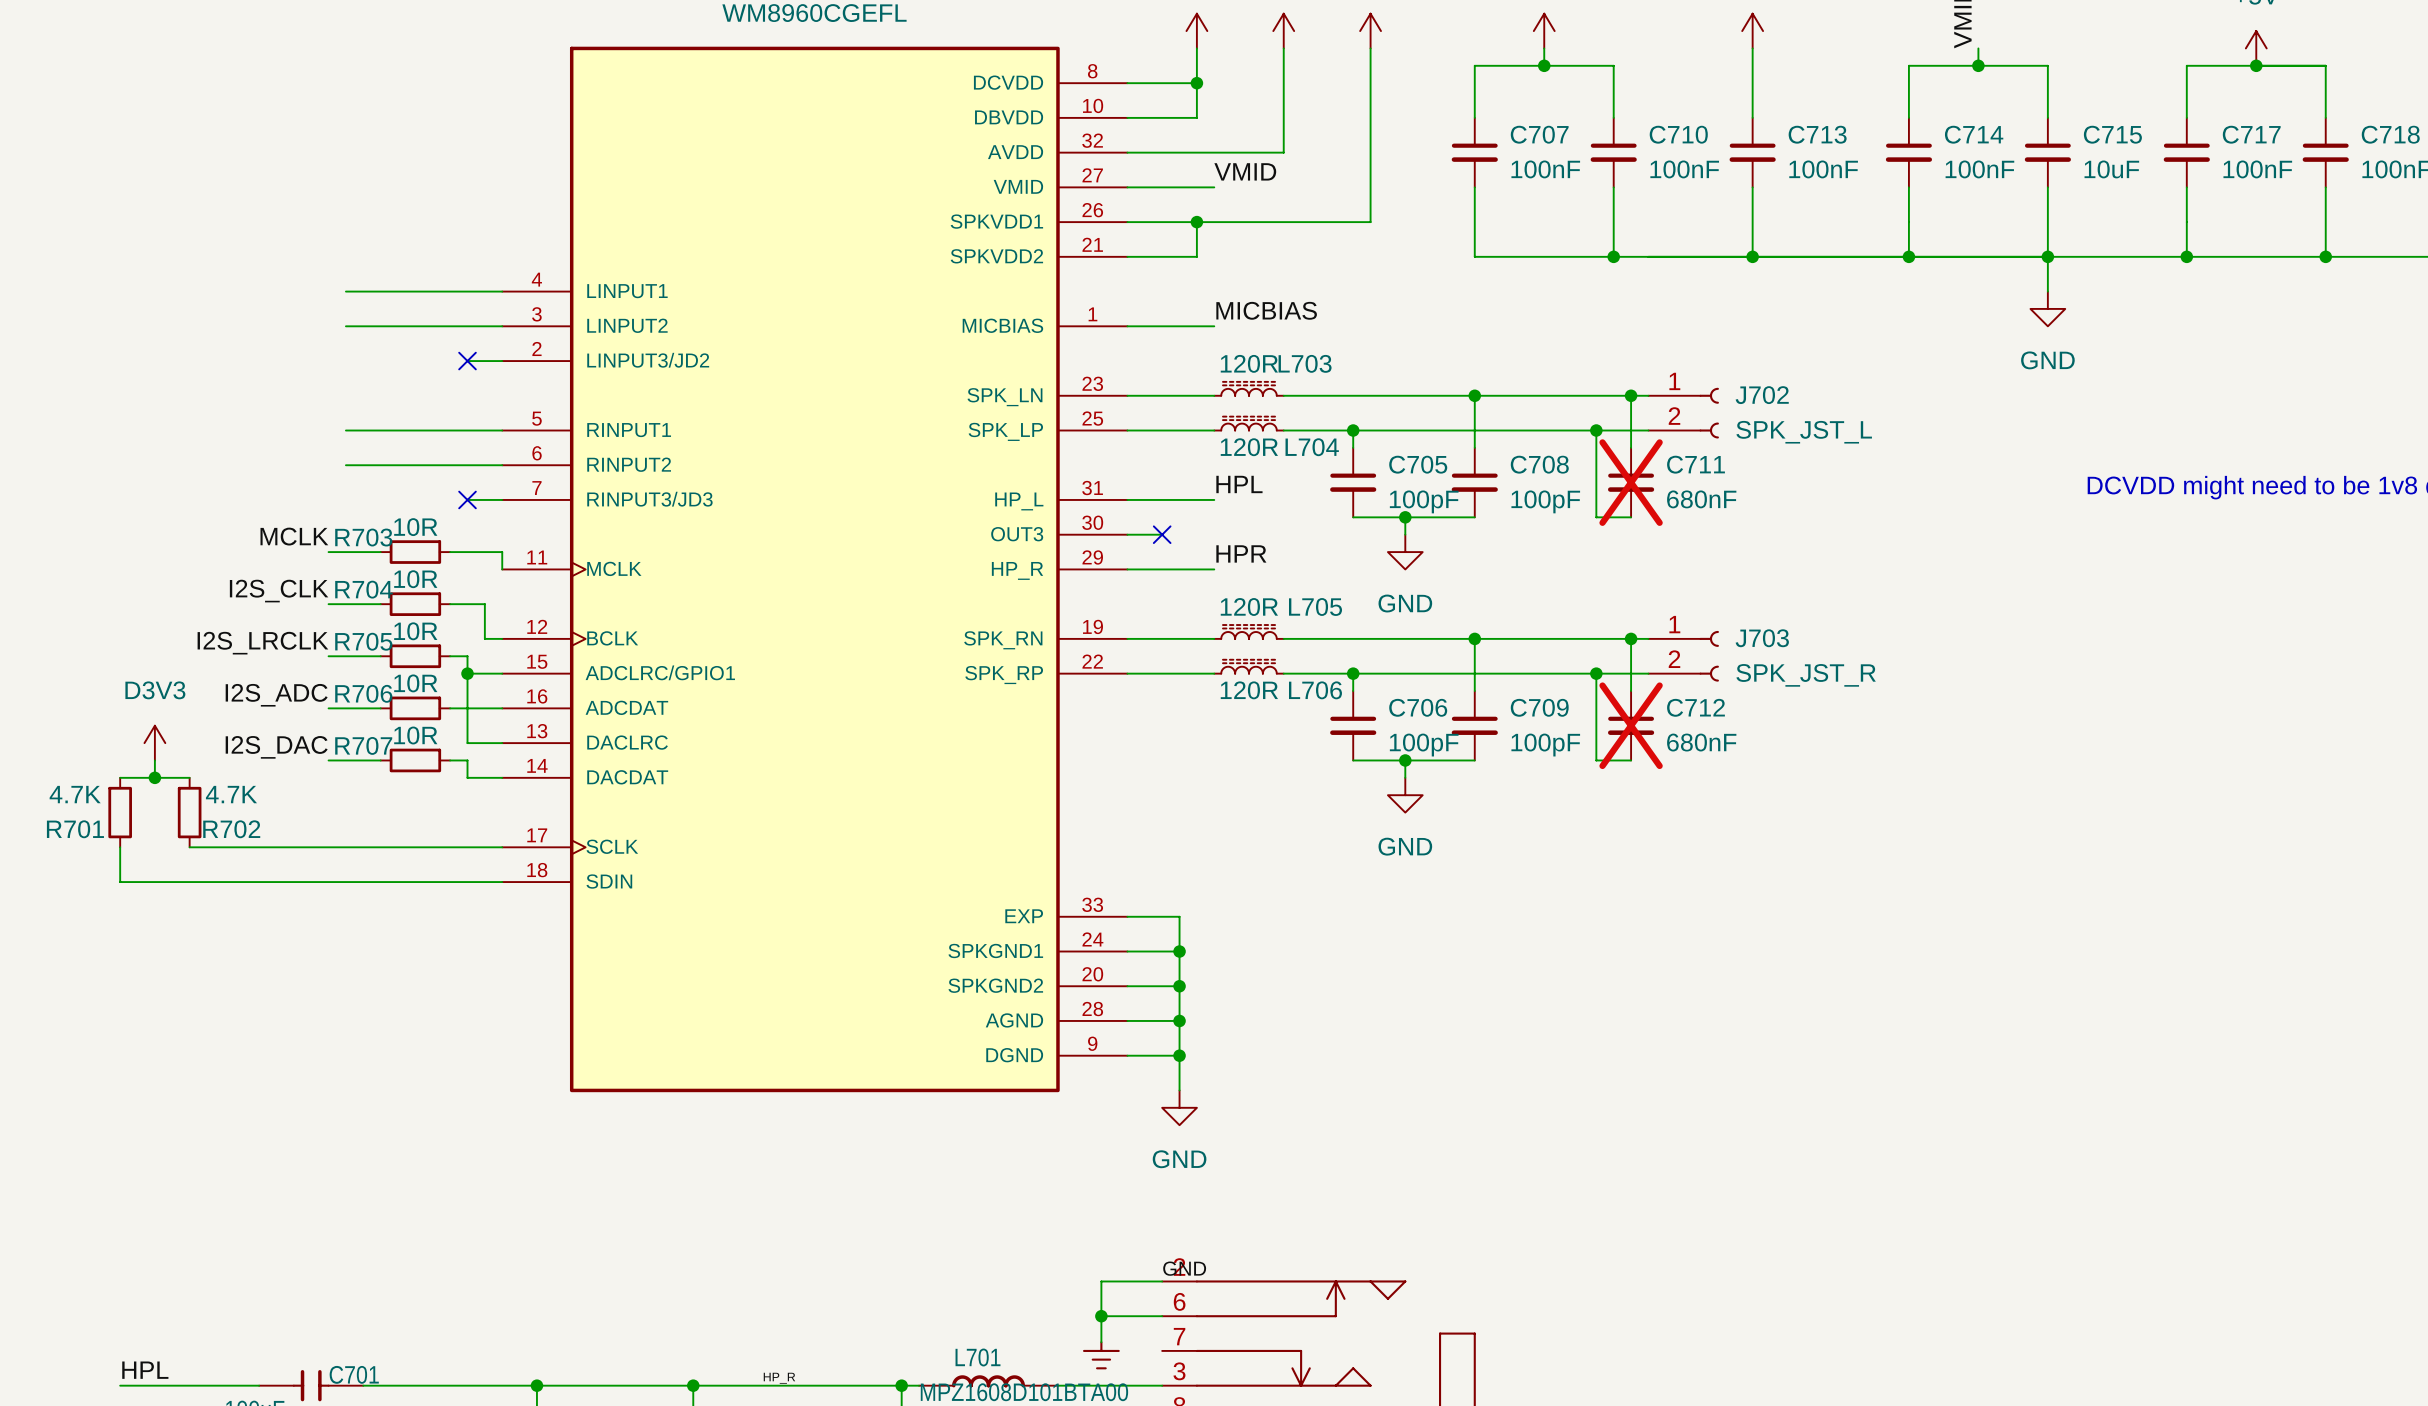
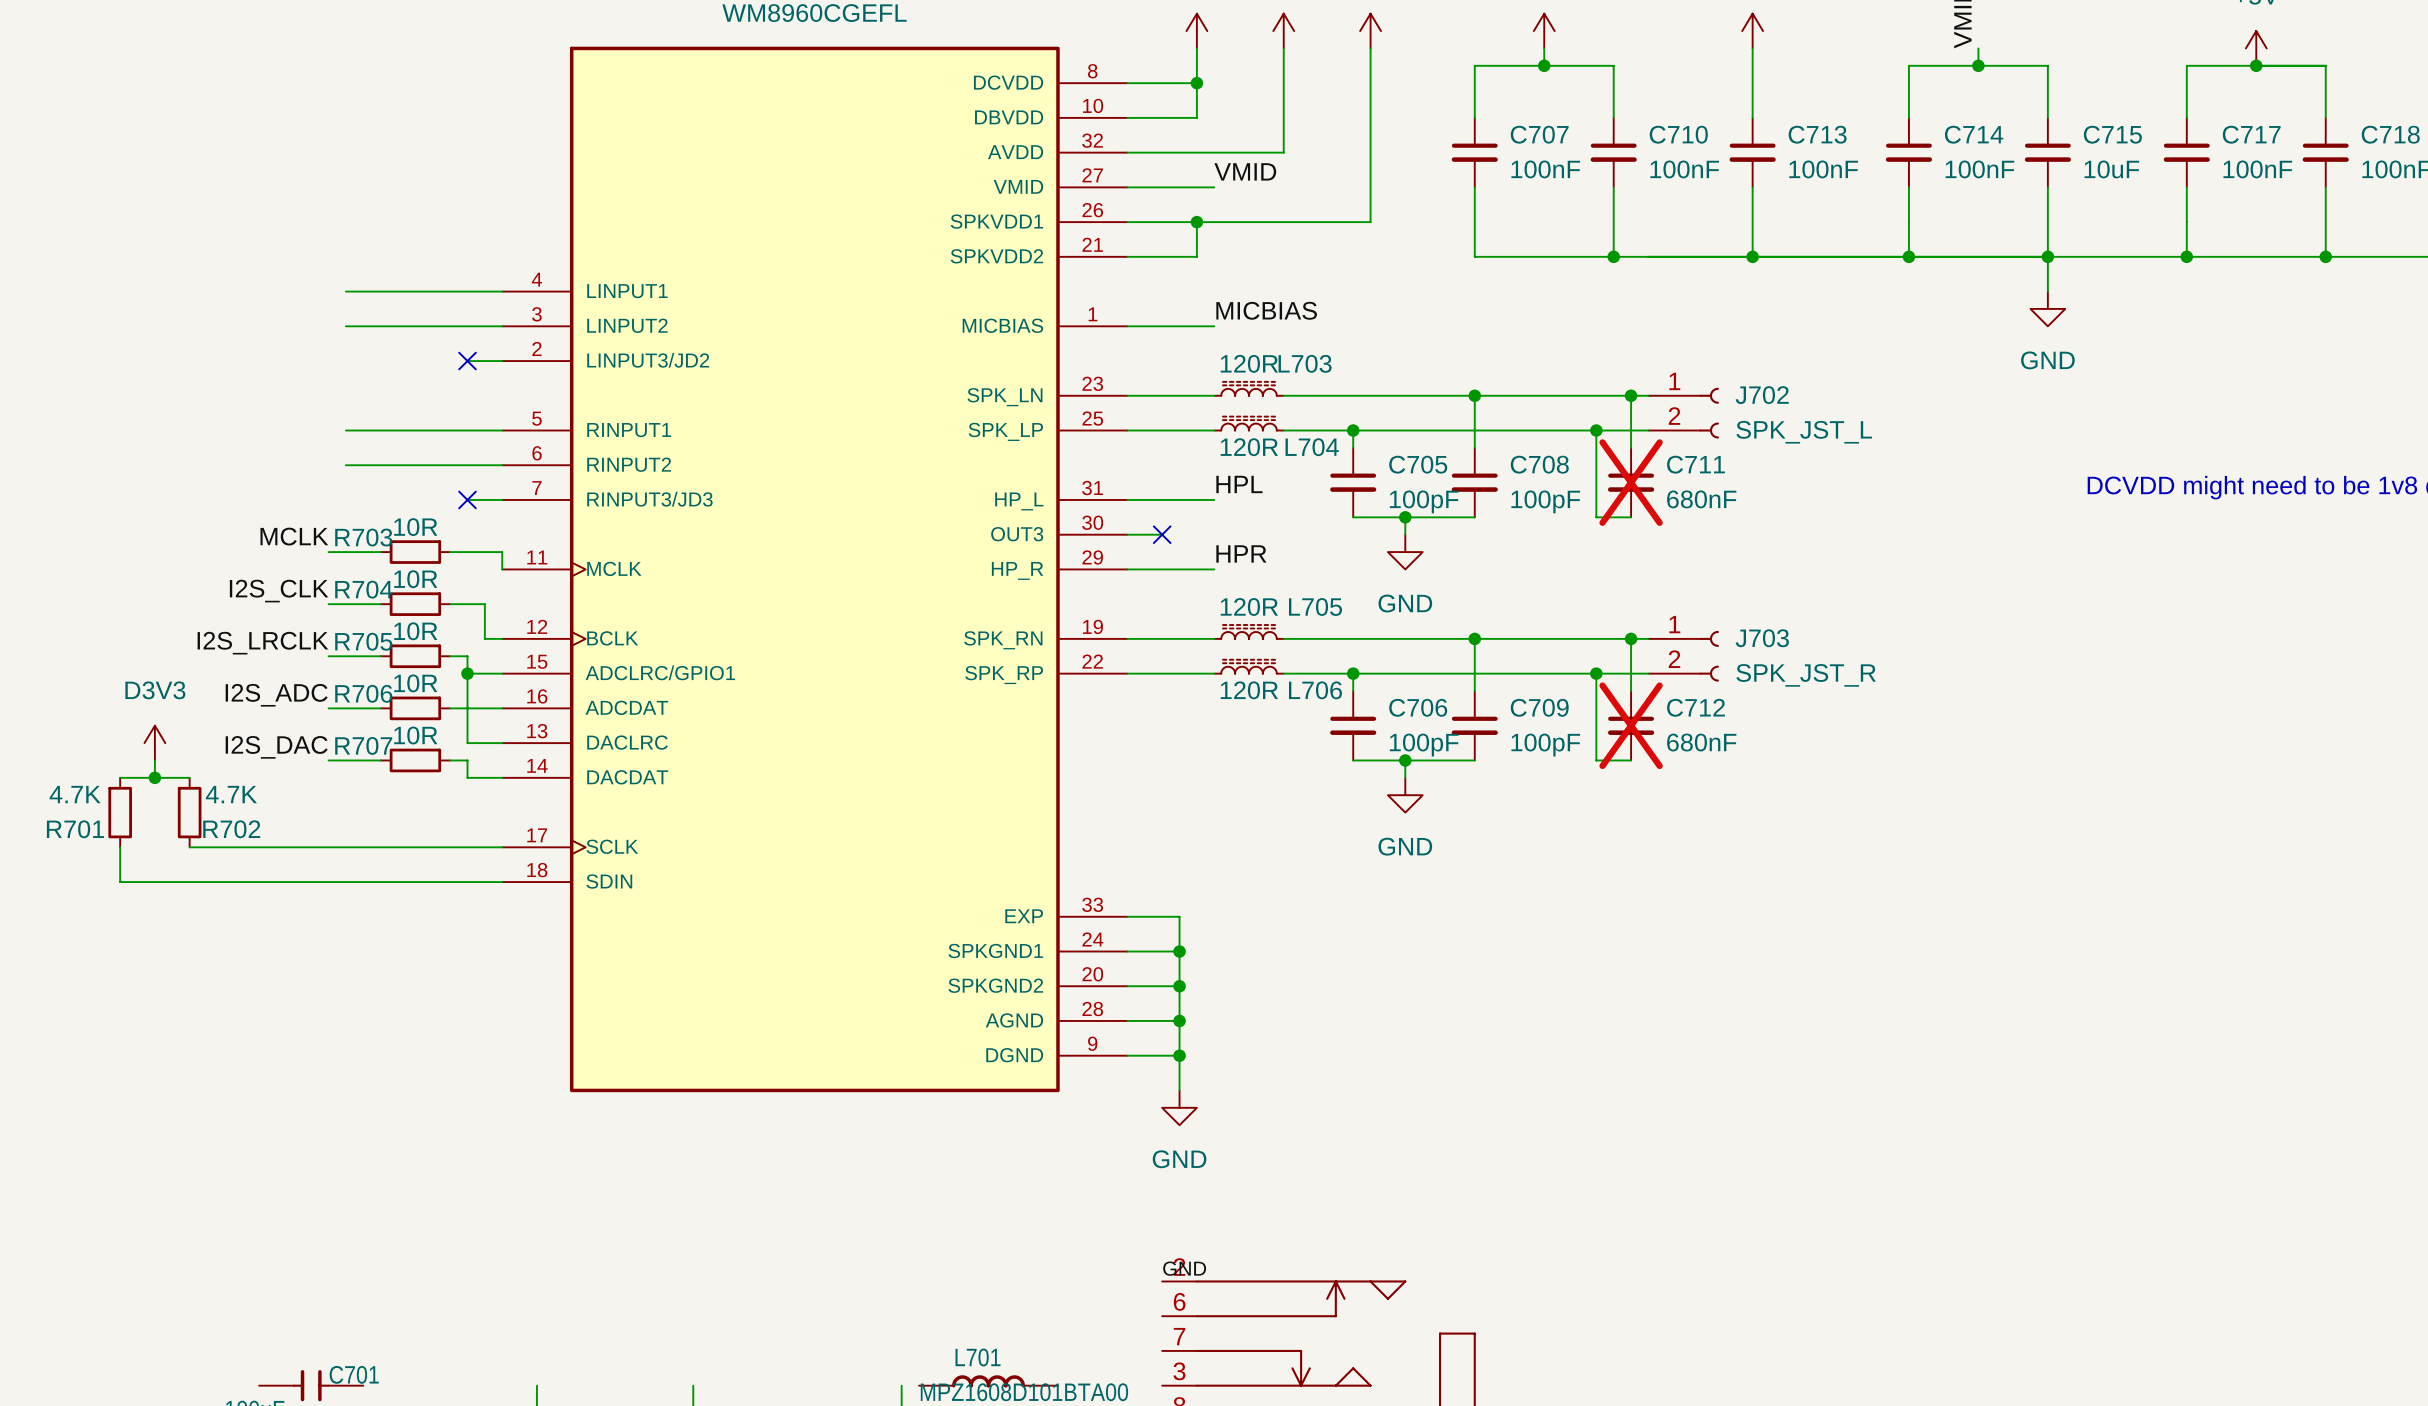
wire: (1162, 1281) (1101, 1281) (1101, 1342) -> none
wire: (1101, 1316) (1162, 1316) -> none
junction: (1101, 1316) -> none
power symbol: (1101, 1355) -> none
label: HPL (145, 1370) -> none
label: HP_R (779, 1378) -> none
wire: (120, 1385) (259, 1385) -> none
wire: (363, 1385) (919, 1385) -> none
junction: (536, 1385) -> none
junction: (693, 1385) -> none
junction: (901, 1385) -> none
wire: (1057, 1385) (1162, 1385) -> none

